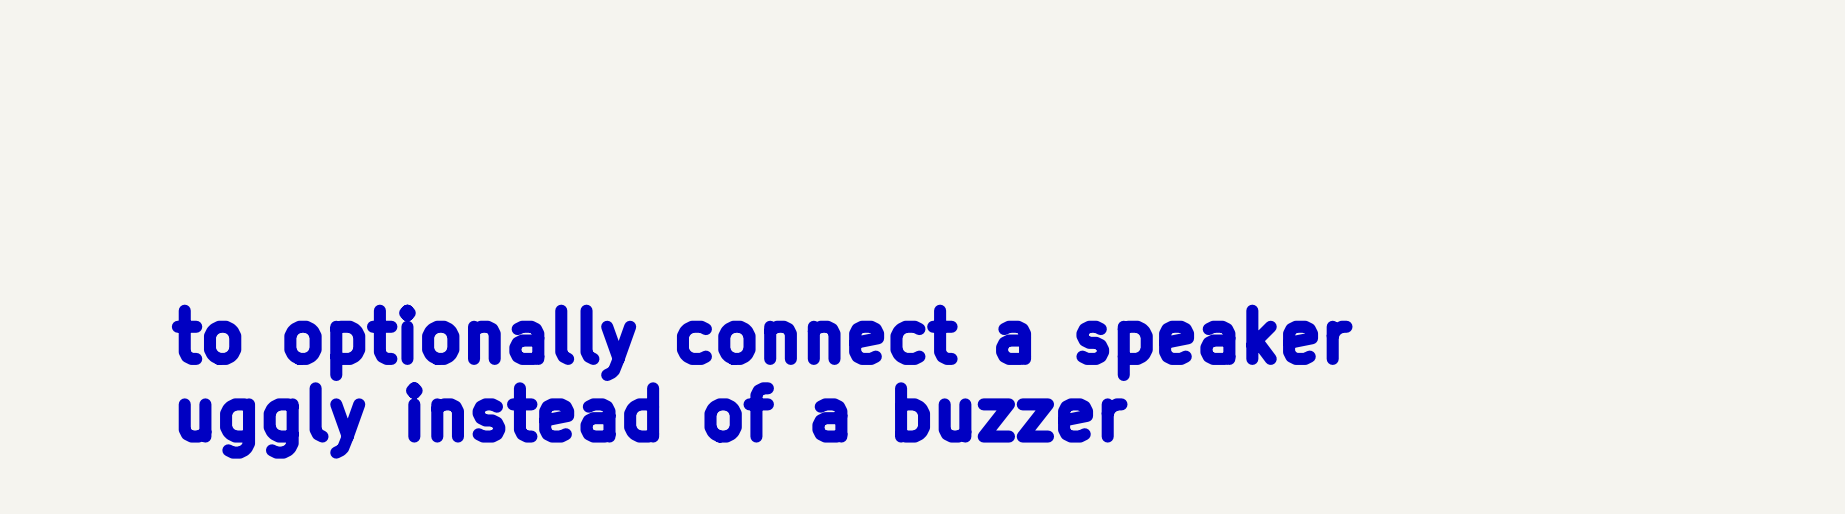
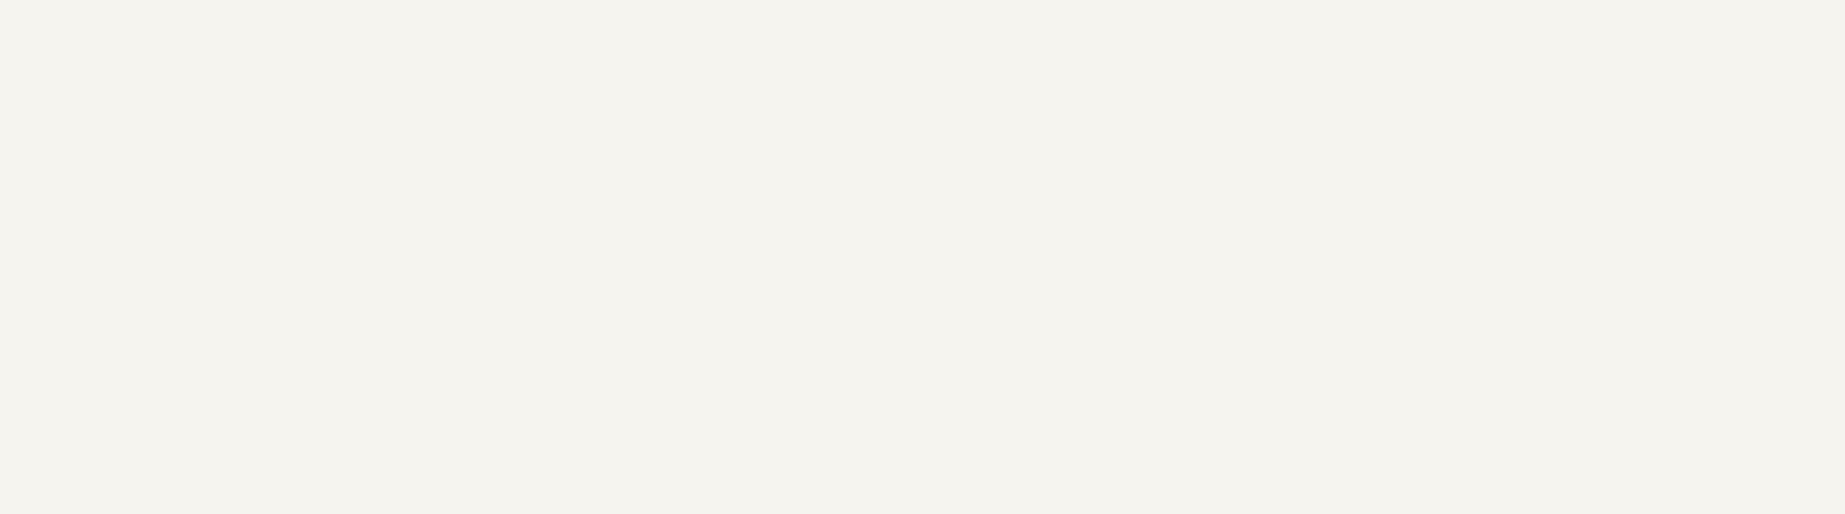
text: to optionally connect a speaker (762, 342) -> none
text: uggly instead of a buzzer (653, 420) -> none

